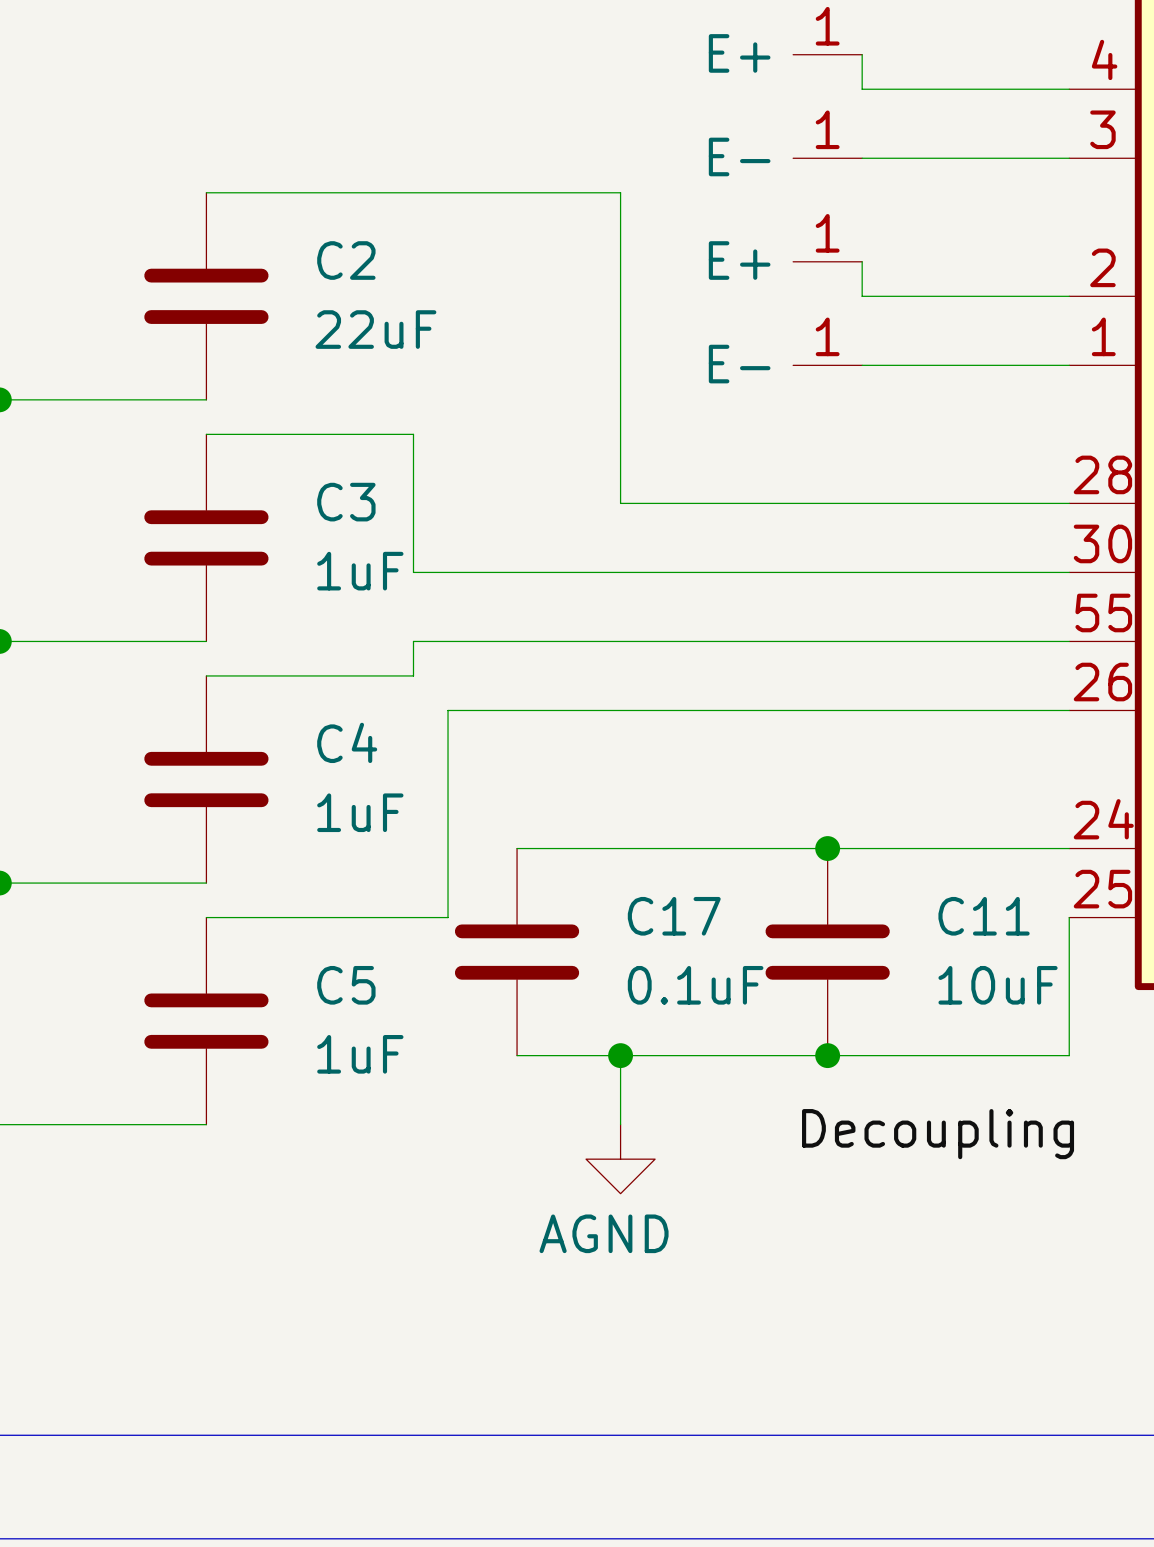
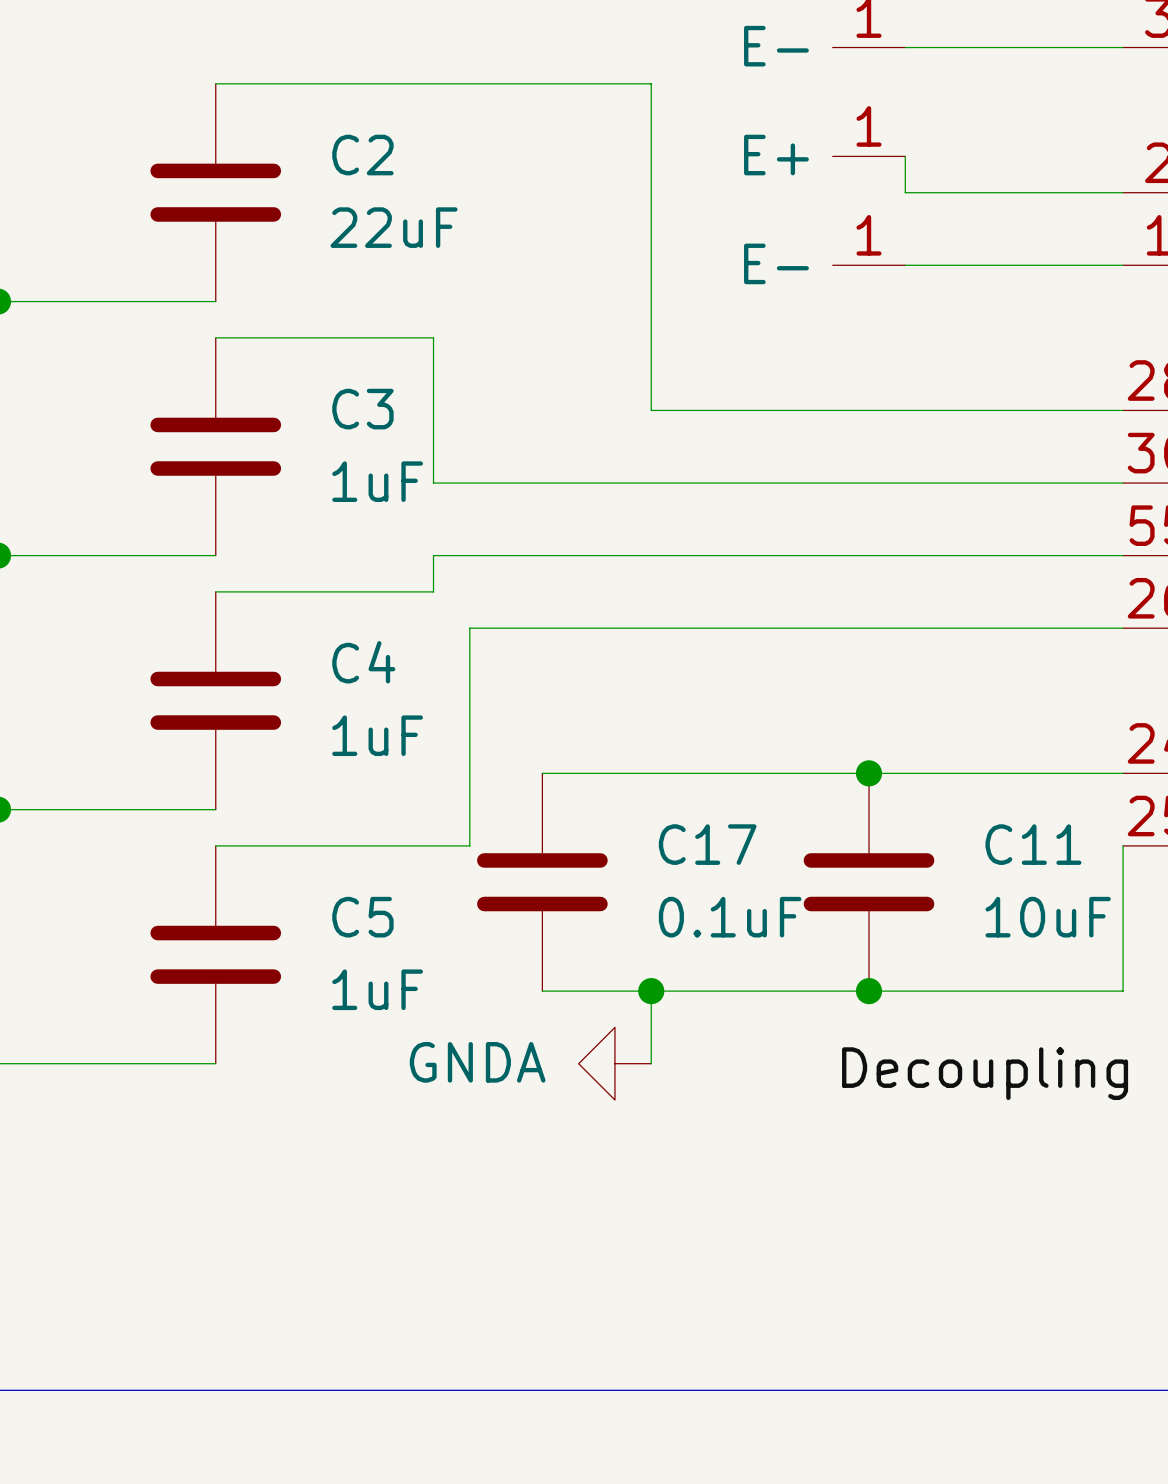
power symbol: none -> GNDA (614, 1063)
power symbol: AGND (620, 1159) -> none

